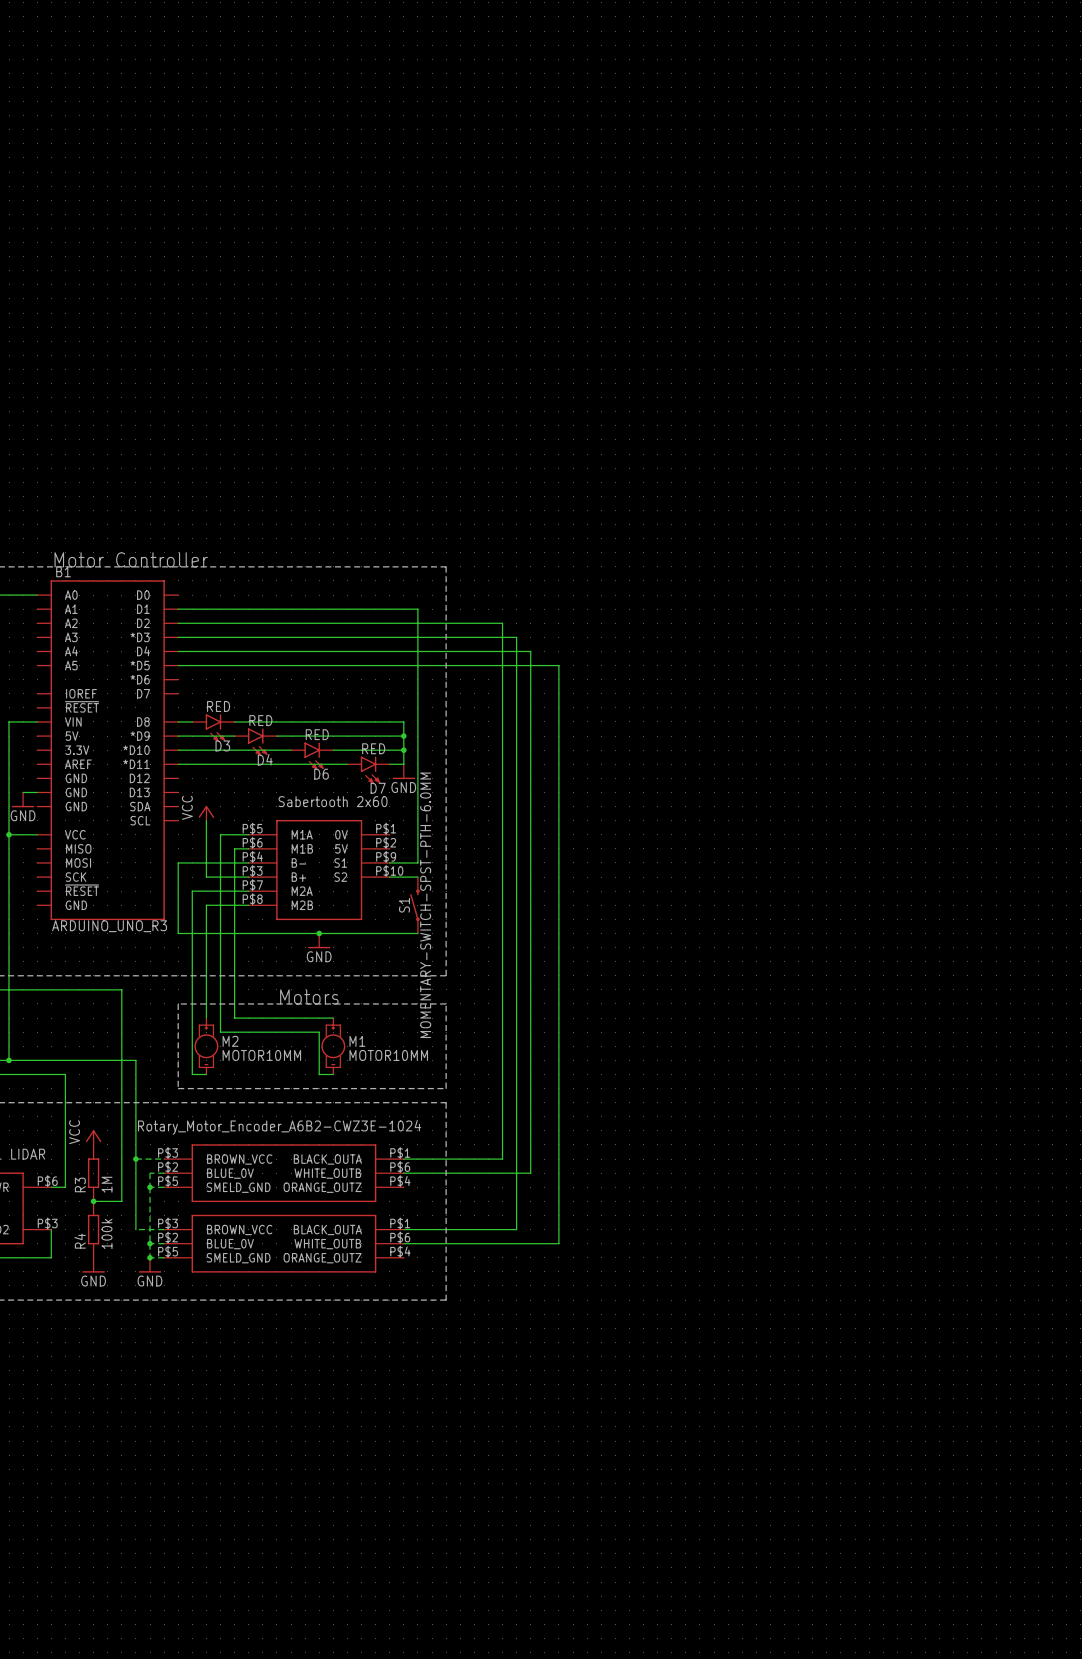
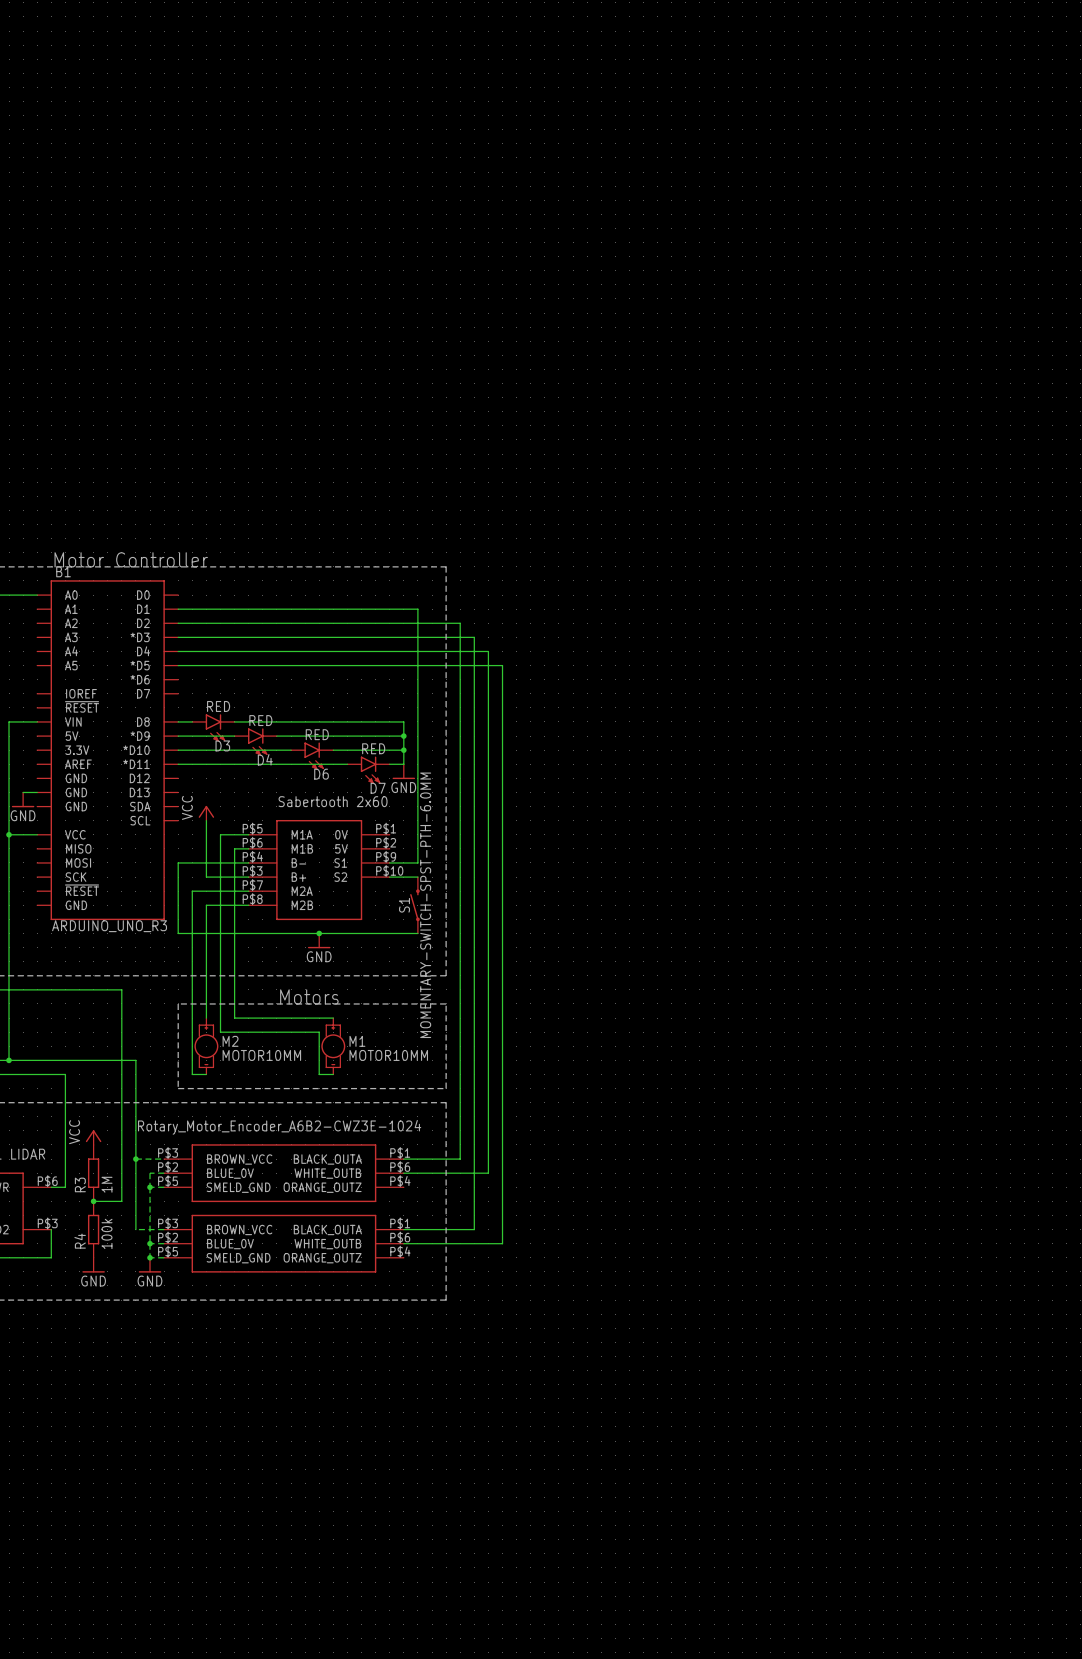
wire: (460, 623) (502, 623) (502, 665) (558, 665) (558, 1243) (502, 1243) -> (460, 623) (460, 1159)
wire: (474, 637) (516, 637) (516, 1229) (474, 1229) -> (474, 637) (474, 1229)
wire: (488, 651) (530, 651) (530, 1173) (488, 1173) -> (488, 651) (488, 1173)
wire: (460, 1159) (502, 1159) -> (502, 1243) (502, 1159)

